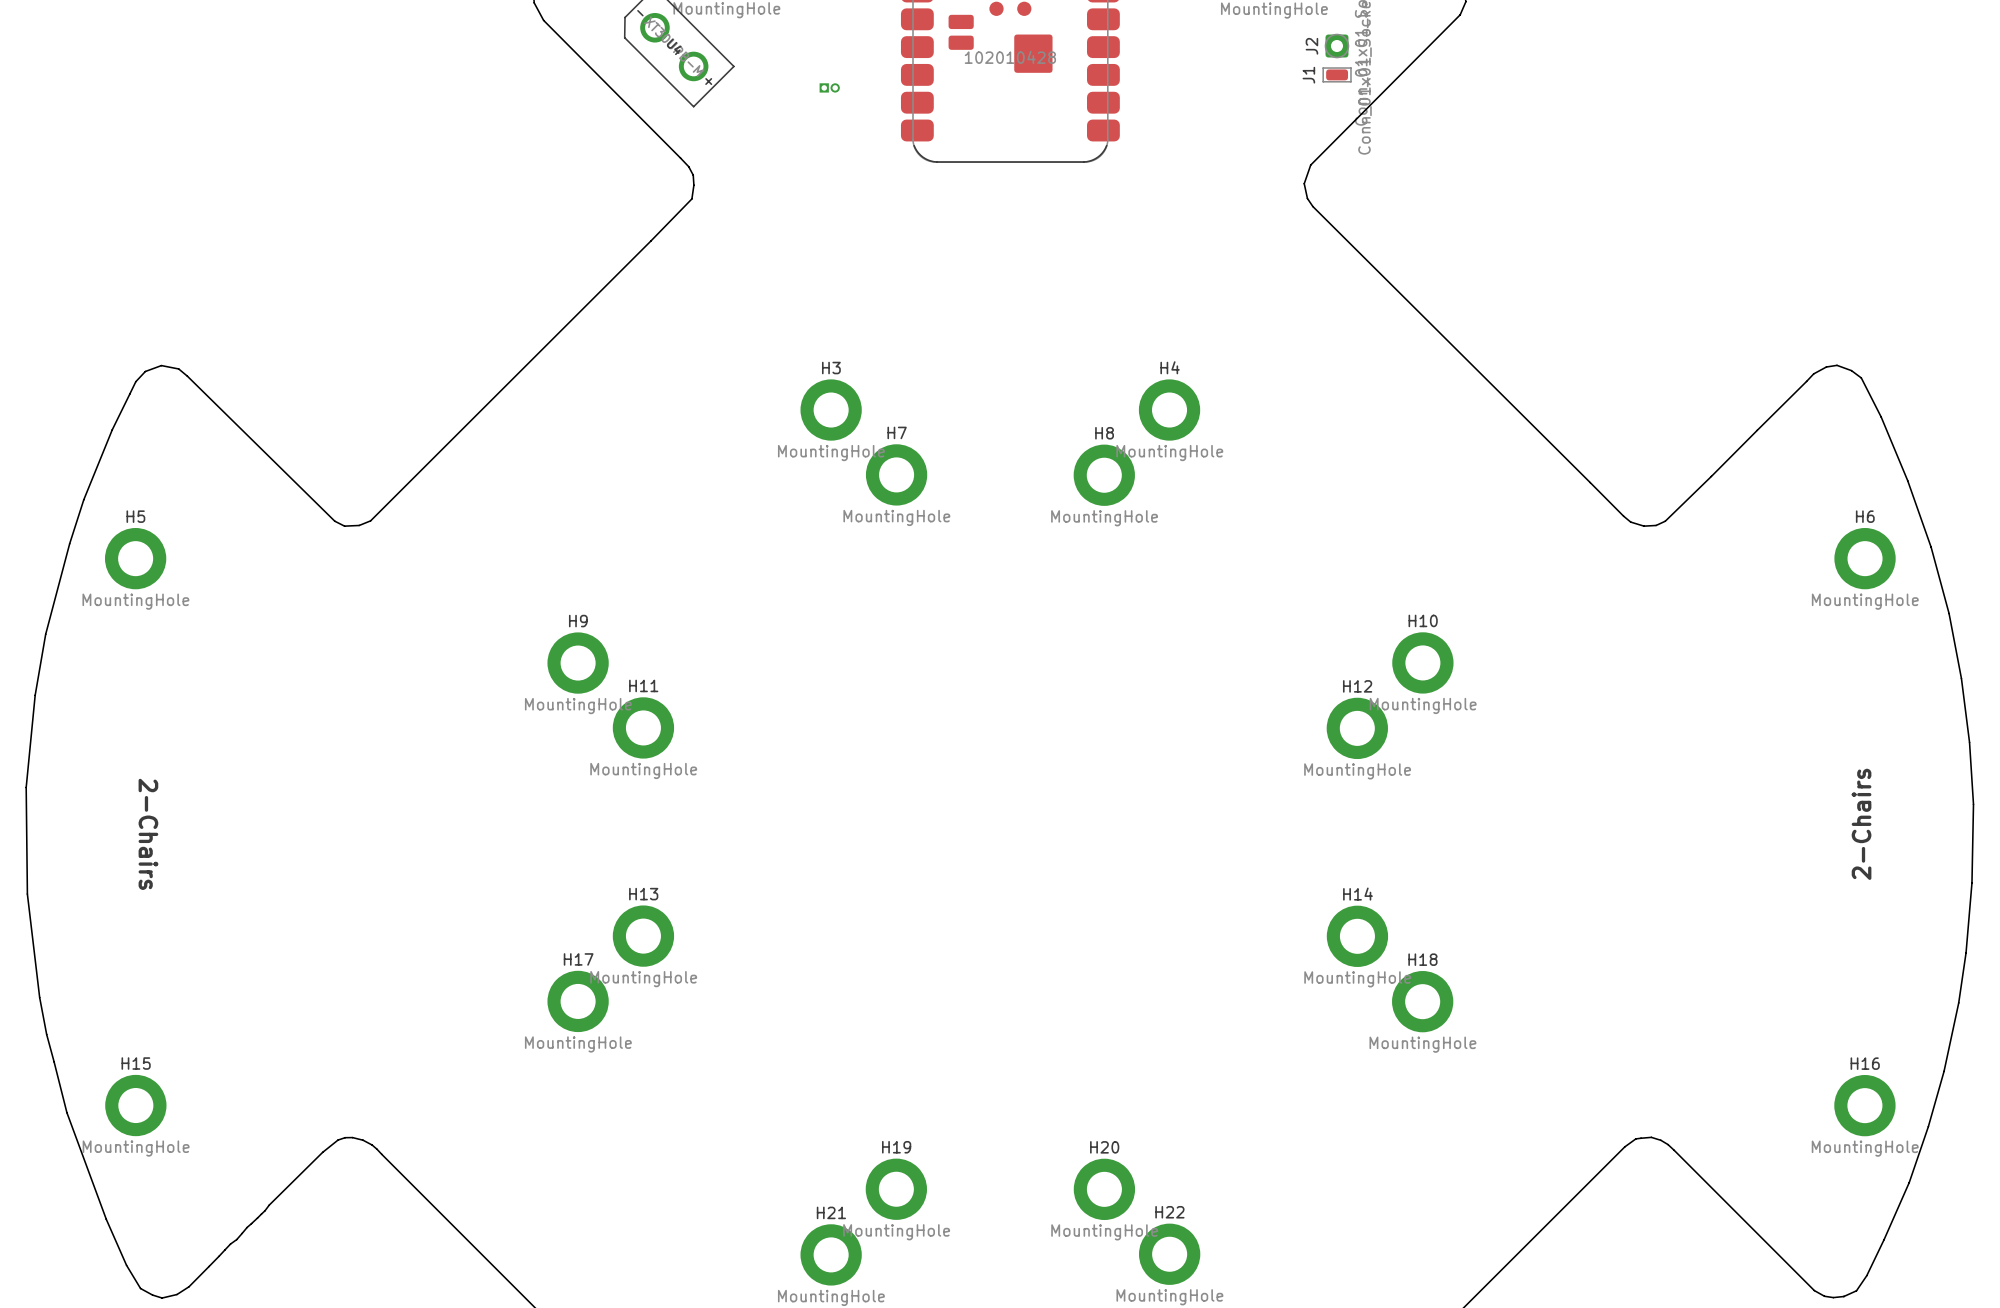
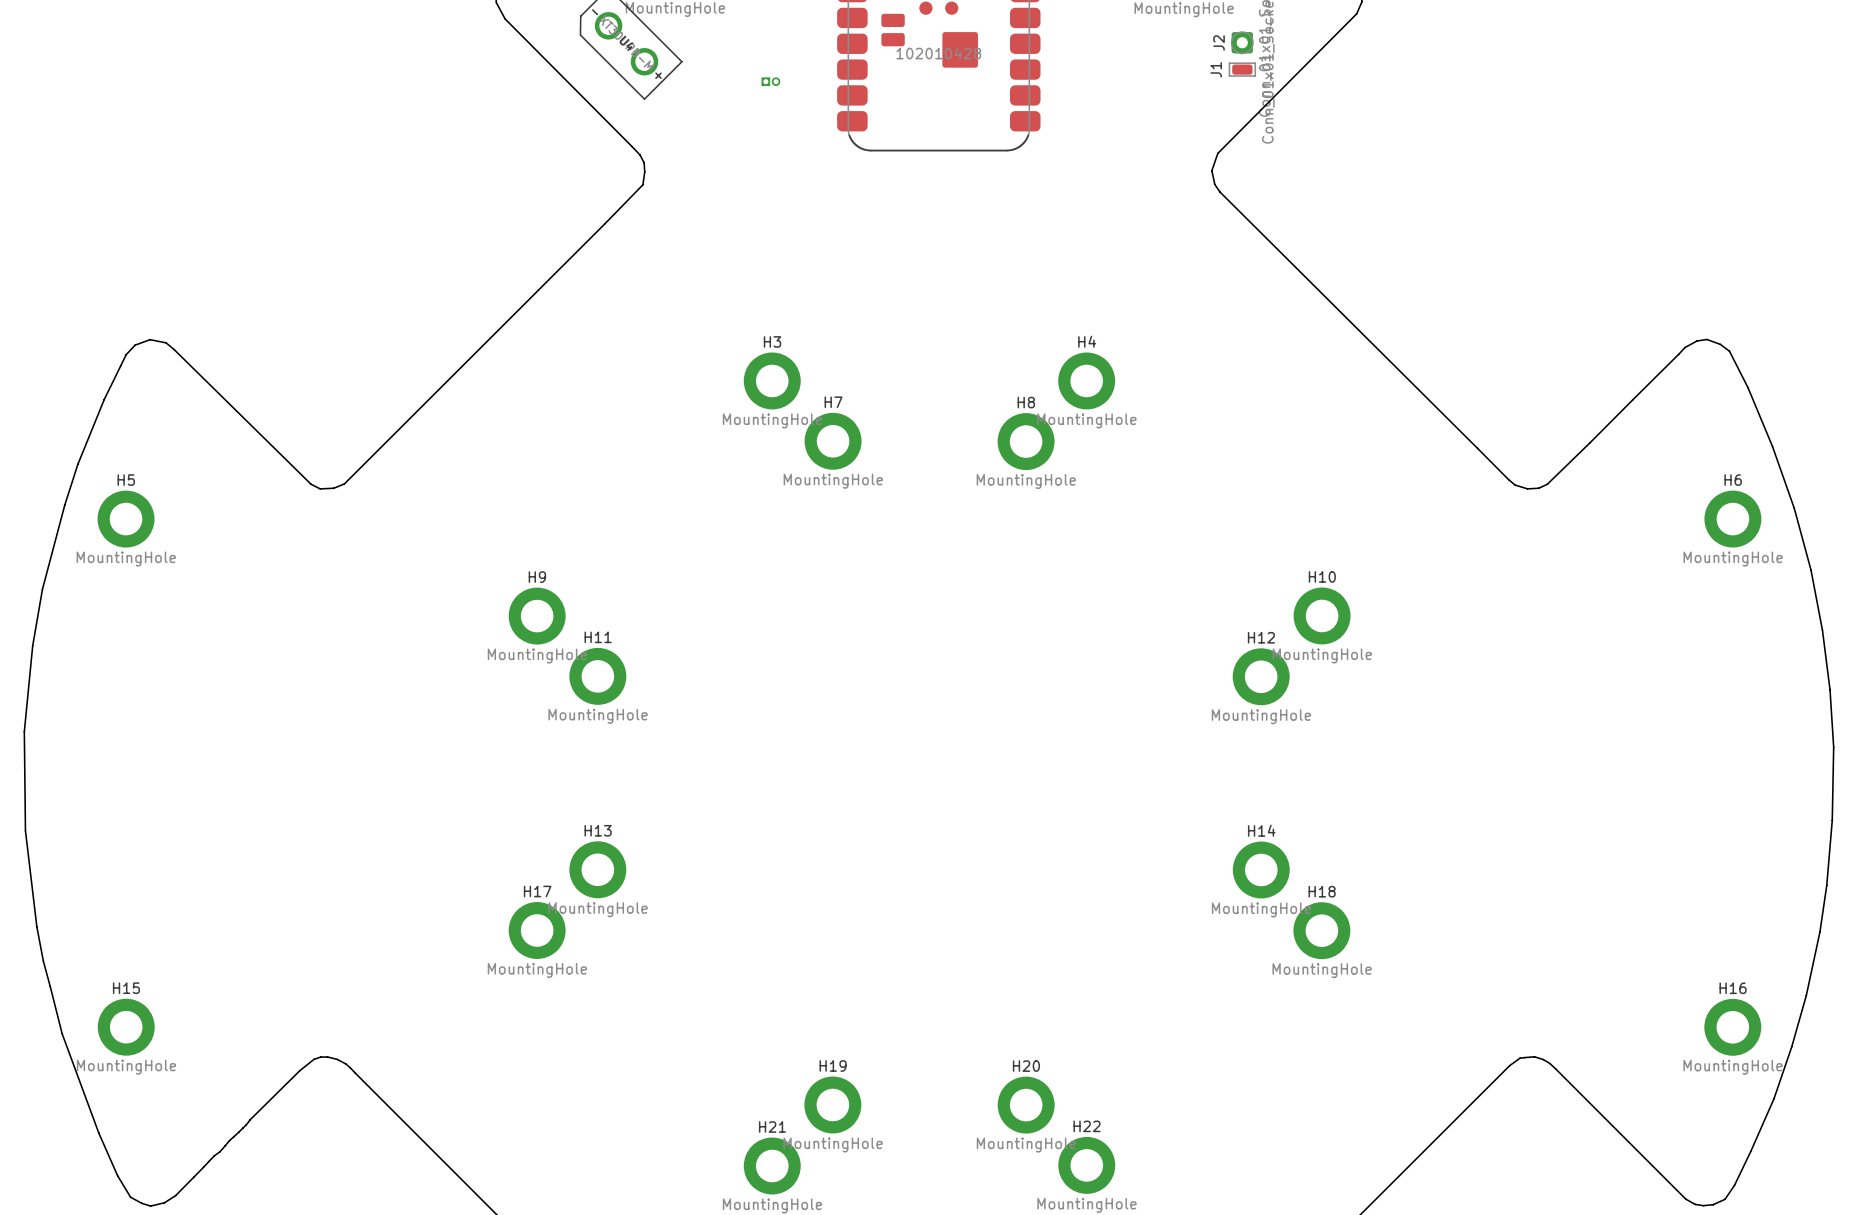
text: 2-Chairs (1861, 824) -> none
text: 2-Chairs (148, 834) -> none

